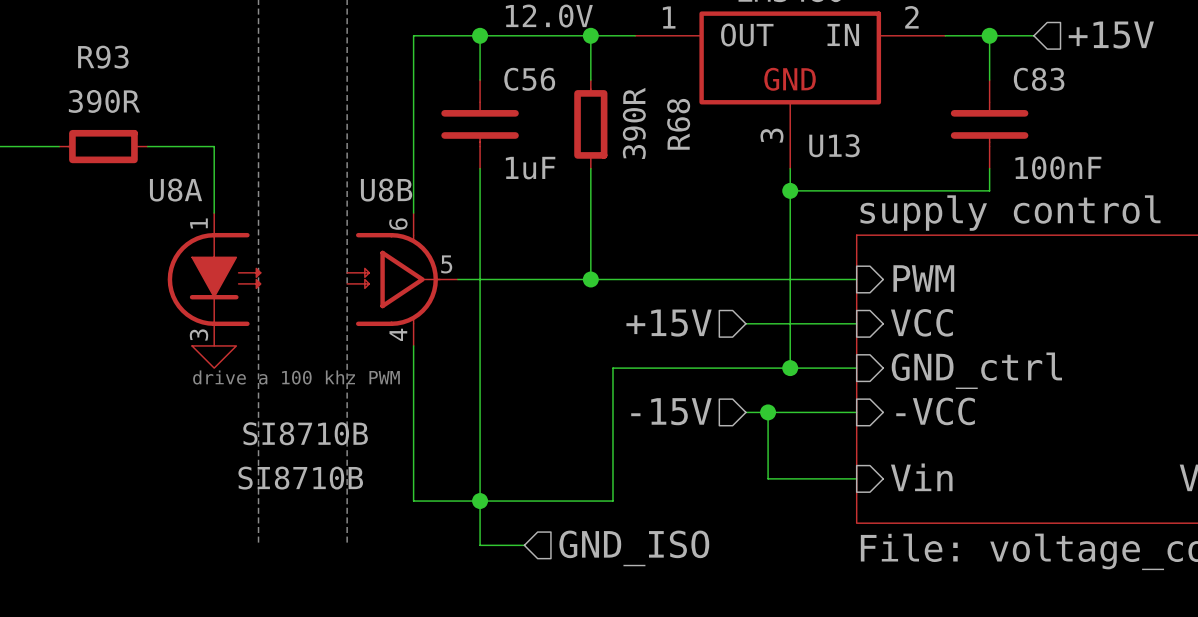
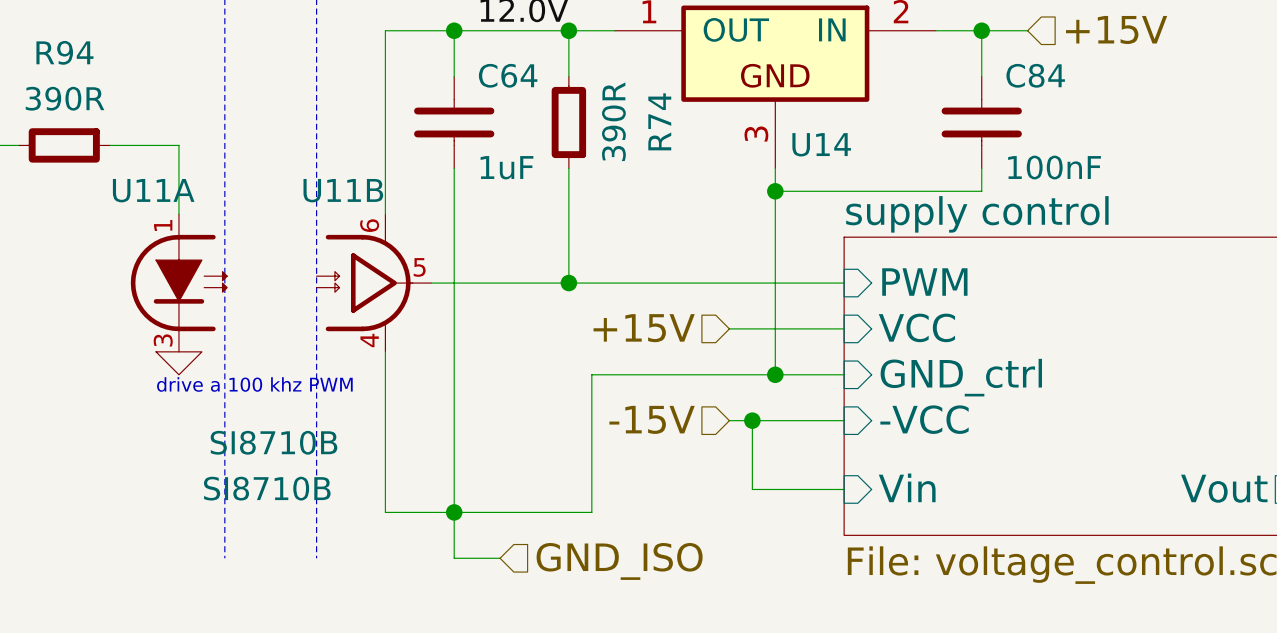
R93 name: R93 (103, 57) -> R94 (64, 52)
C56 name: C56 (529, 79) -> C64 (508, 75)
C83 name: C83 (1039, 79) -> C84 (1035, 75)
R68 name: R68 (678, 124) -> R74 (659, 121)
U13 name: U13 (834, 145) -> U14 (821, 144)
U8A name: U8A (176, 190) -> U11A (153, 190)
U8B name: U8B (386, 190) -> U11B (343, 190)

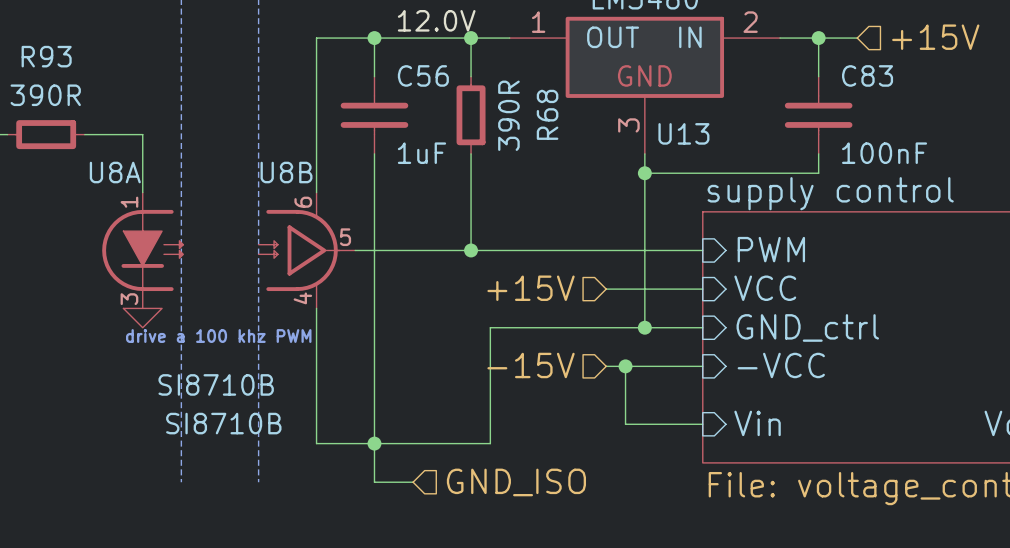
R94 name: R94 (64, 52) -> R93 (46, 56)
C64 name: C64 (508, 75) -> C56 (423, 75)
C84 name: C84 (1035, 75) -> C83 (867, 75)
R74 name: R74 (659, 121) -> R68 (547, 114)
U14 name: U14 (821, 144) -> U13 (683, 133)
U11A name: U11A (153, 190) -> U8A (115, 172)
U11B name: U11B (343, 190) -> U8B (286, 172)

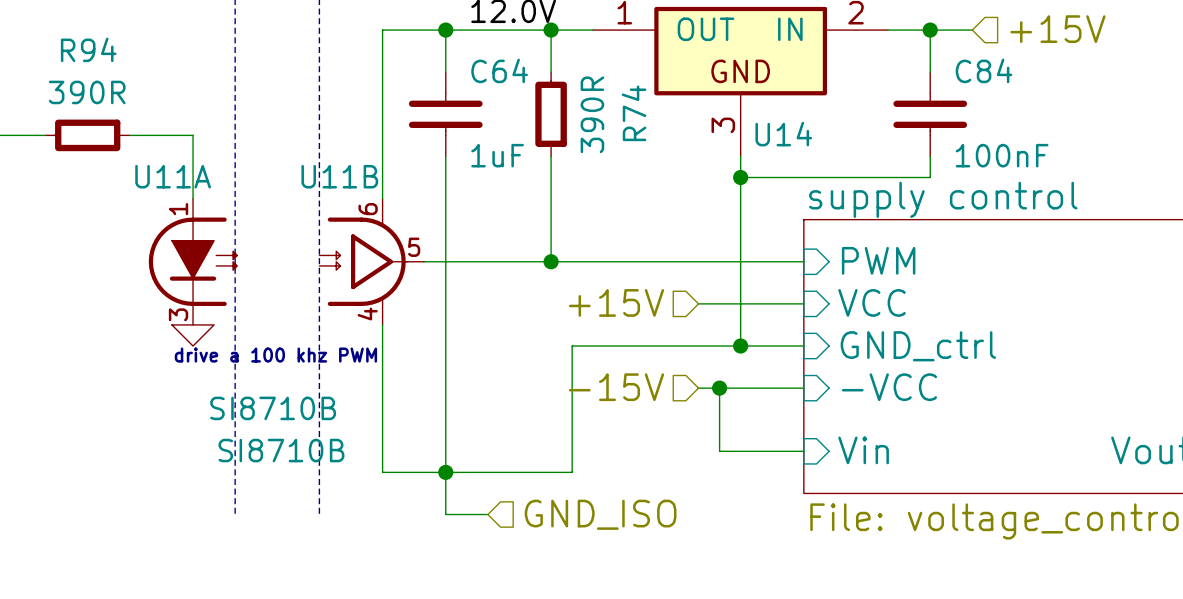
R93 name: R93 (46, 56) -> R94 (88, 49)
C56 name: C56 (423, 75) -> C64 (499, 70)
C83 name: C83 (867, 75) -> C84 (984, 70)
R68 name: R68 (547, 114) -> R74 (634, 113)
U13 name: U13 (683, 133) -> U14 (783, 134)
U8A name: U8A (115, 172) -> U11A (173, 176)
U8B name: U8B (286, 172) -> U11B (339, 176)

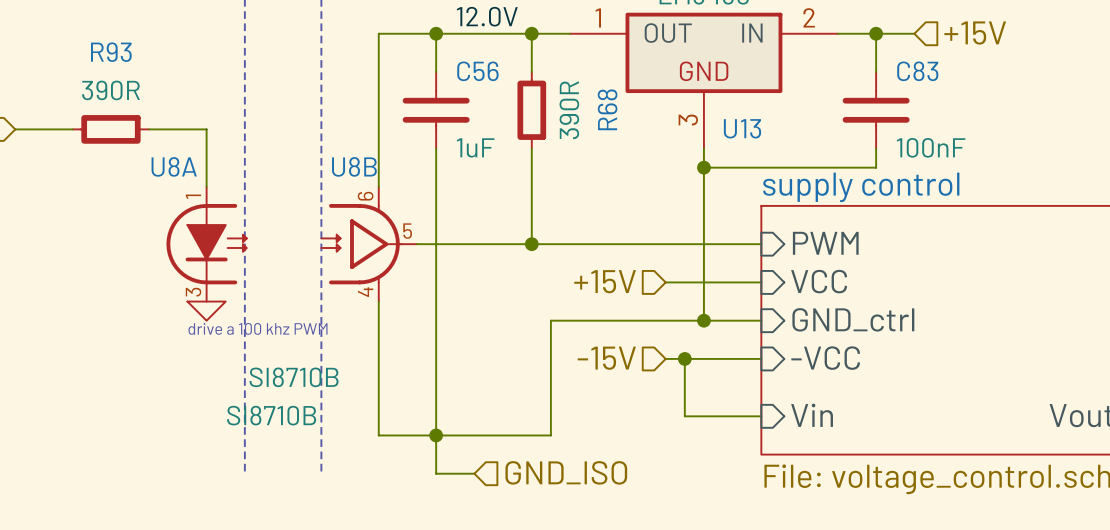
R94 name: R94 (88, 49) -> R93 (111, 52)
C64 name: C64 (499, 70) -> C56 (477, 71)
C84 name: C84 (984, 70) -> C83 (917, 71)
R74 name: R74 (634, 113) -> R68 (607, 109)
U14 name: U14 (783, 134) -> U13 (742, 128)
U11A name: U11A (173, 176) -> U8A (174, 166)
U11B name: U11B (339, 176) -> U8B (354, 166)

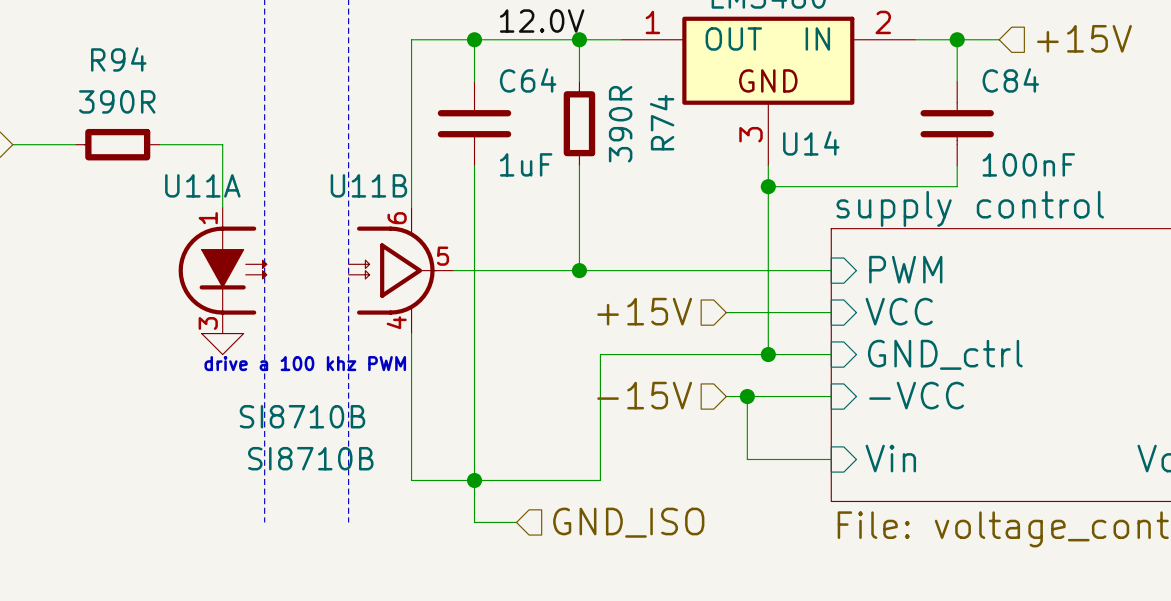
R93 name: R93 (111, 52) -> R94 (118, 59)
C56 name: C56 (477, 71) -> C64 (528, 80)
C83 name: C83 (917, 71) -> C84 (1010, 80)
R68 name: R68 (607, 109) -> R74 (662, 122)
U13 name: U13 (742, 128) -> U14 (811, 143)
U8A name: U8A (174, 166) -> U11A (202, 185)
U8B name: U8B (354, 166) -> U11B (368, 185)

